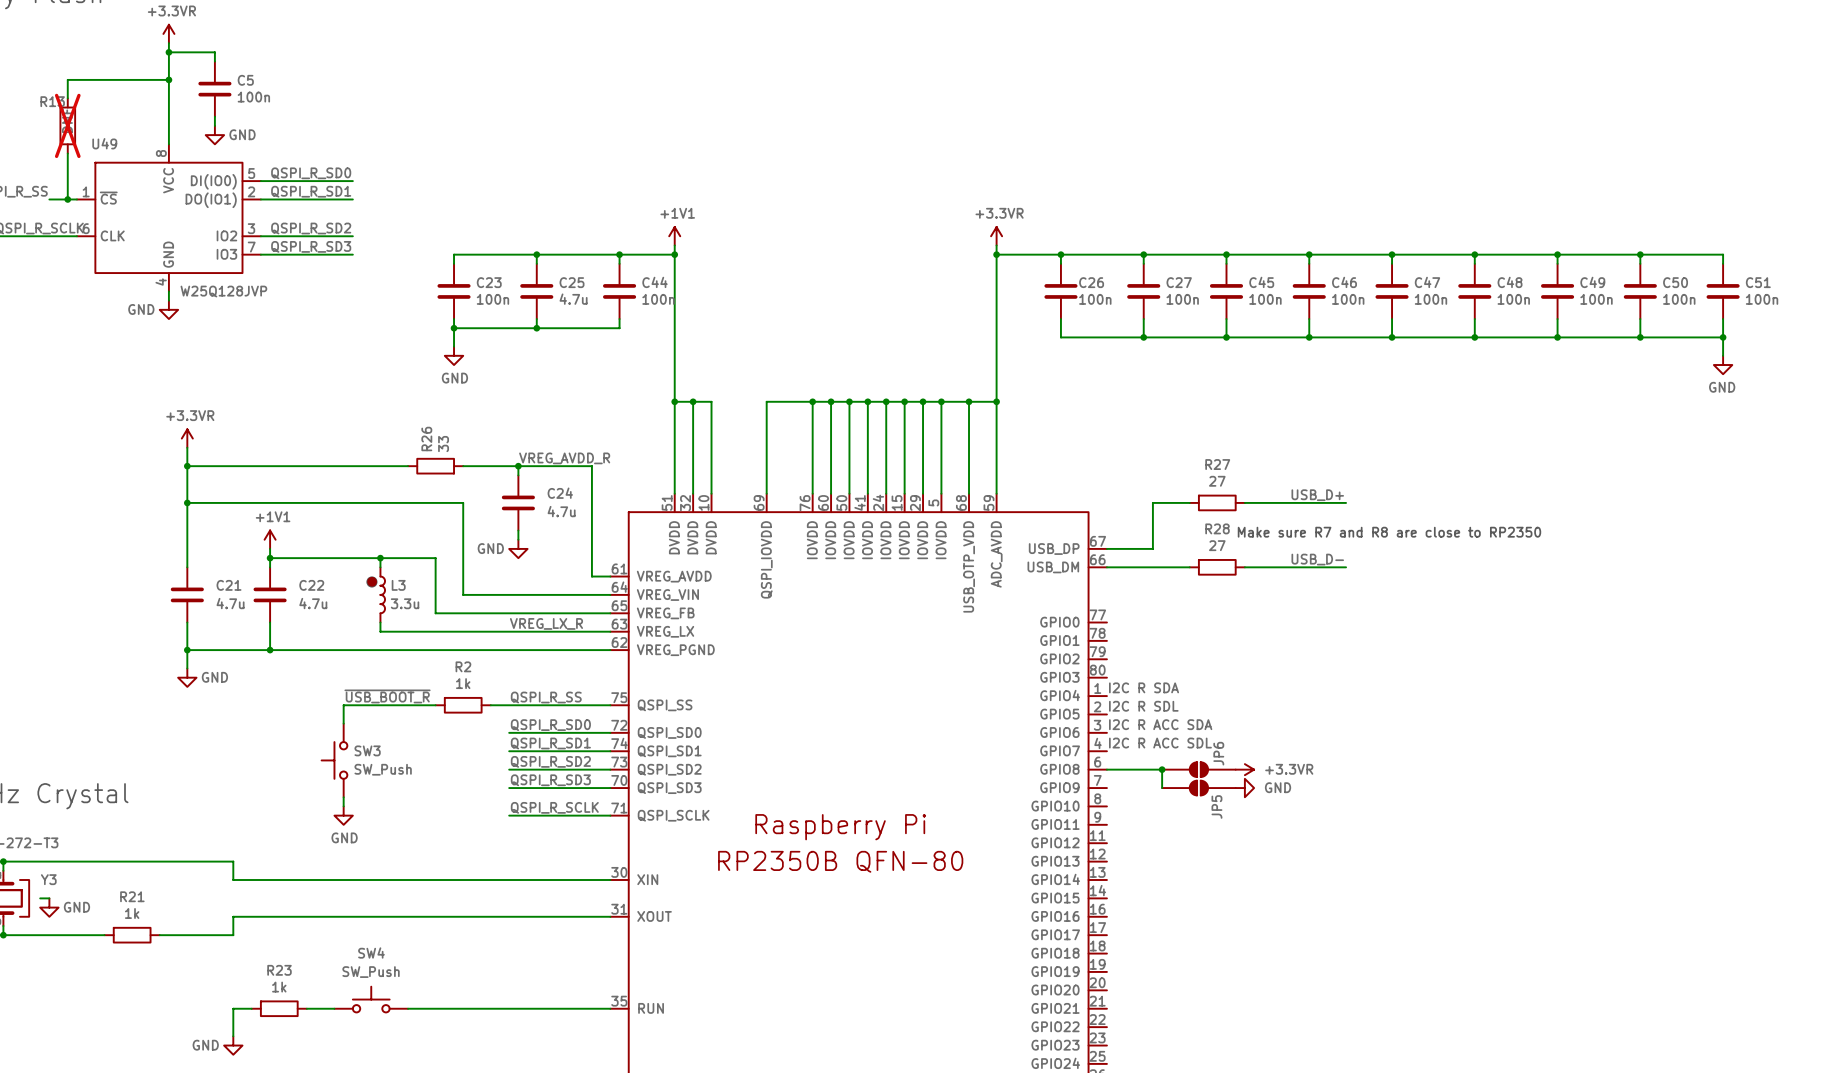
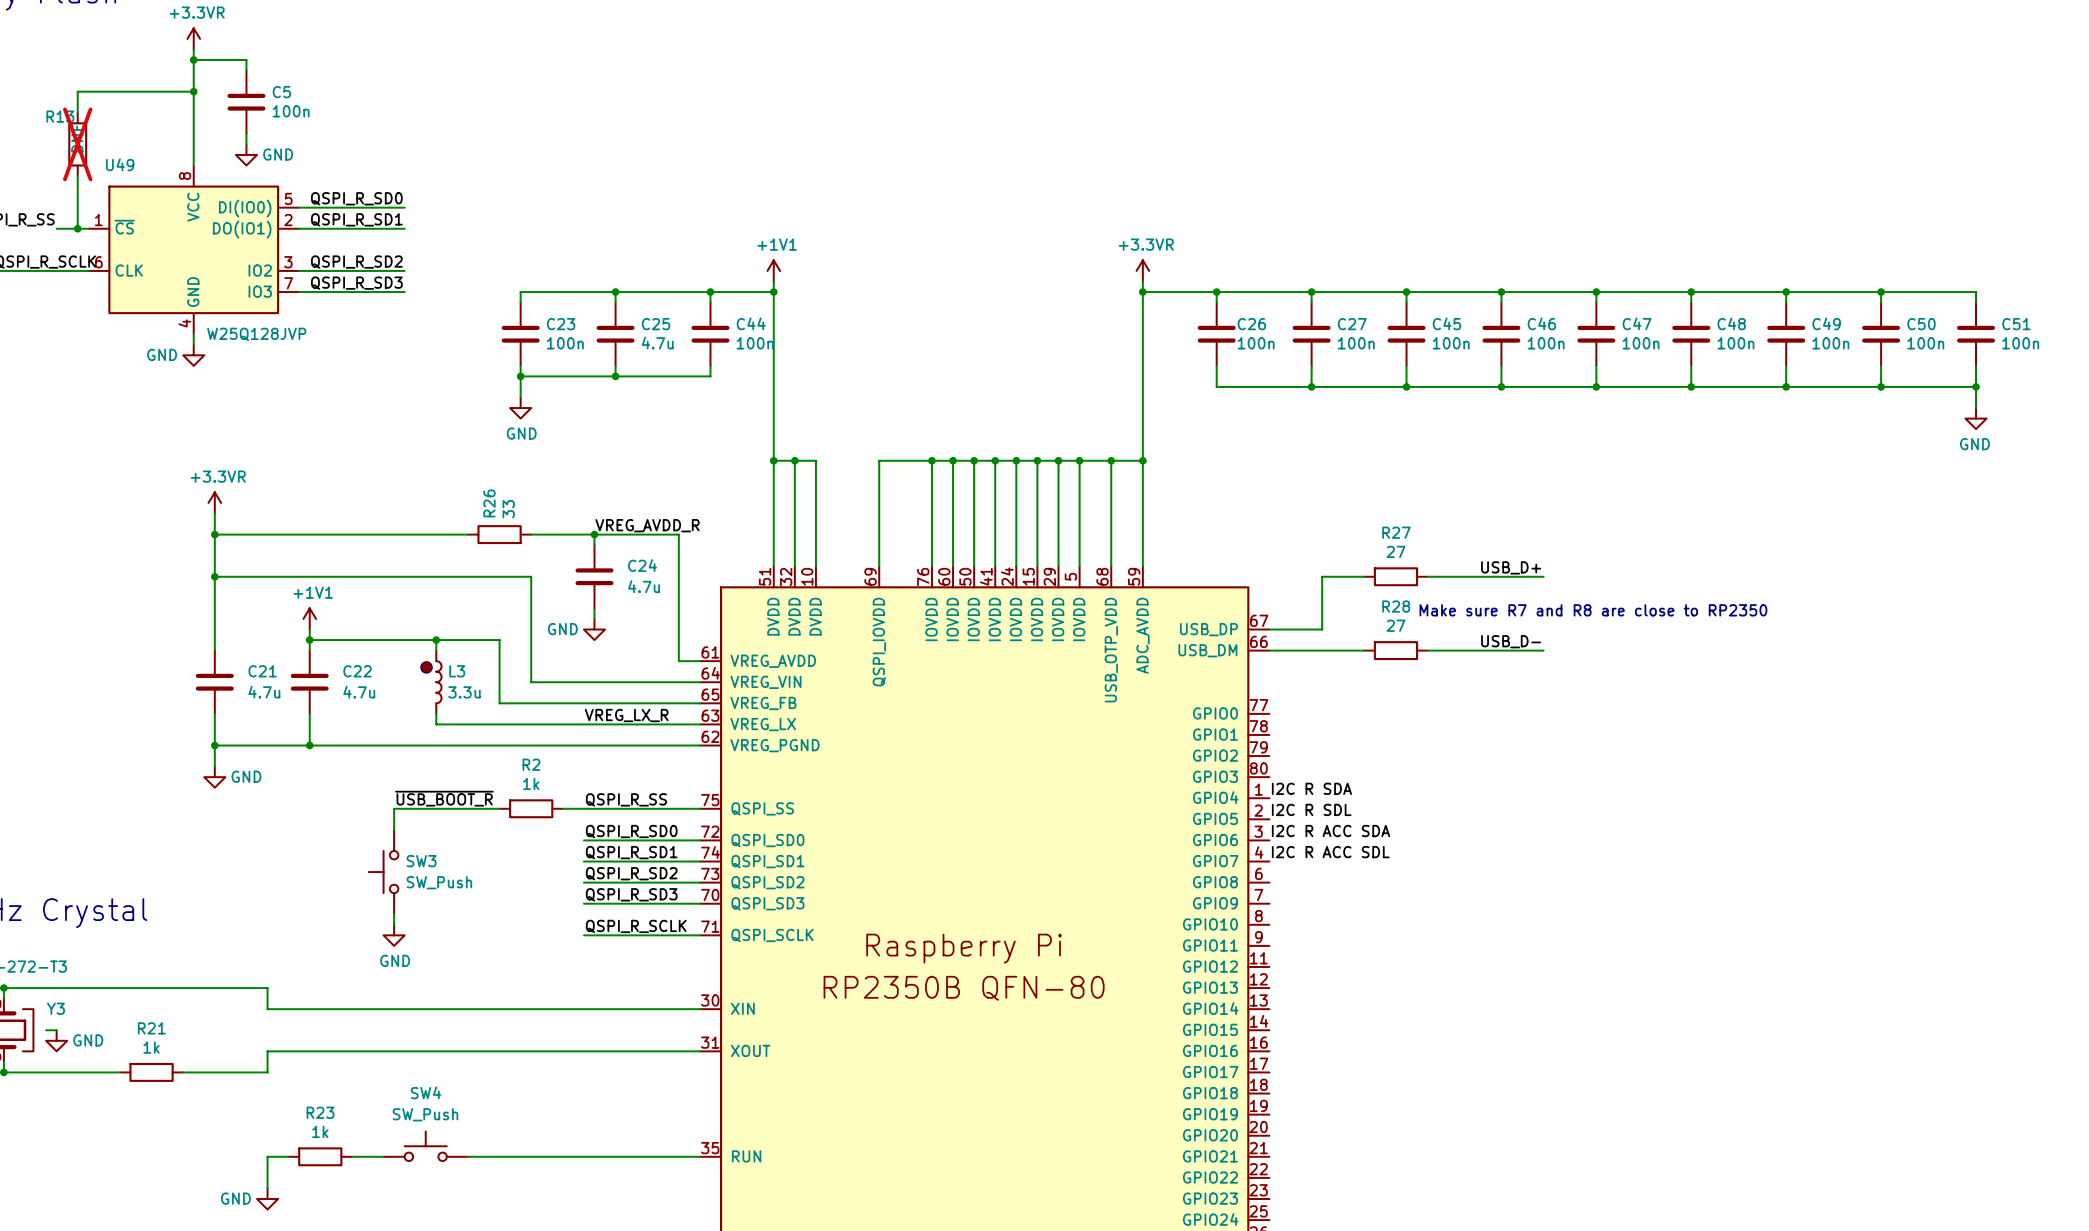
wire: (1106, 769) (1162, 769) (1162, 788) -> none
junction: (1162, 769) -> none
JP6: (1198, 769) -> none
power symbol: +3.3VR (1244, 769) -> none
JP5: (1198, 788) -> none
power symbol: GND (1244, 788) -> none

